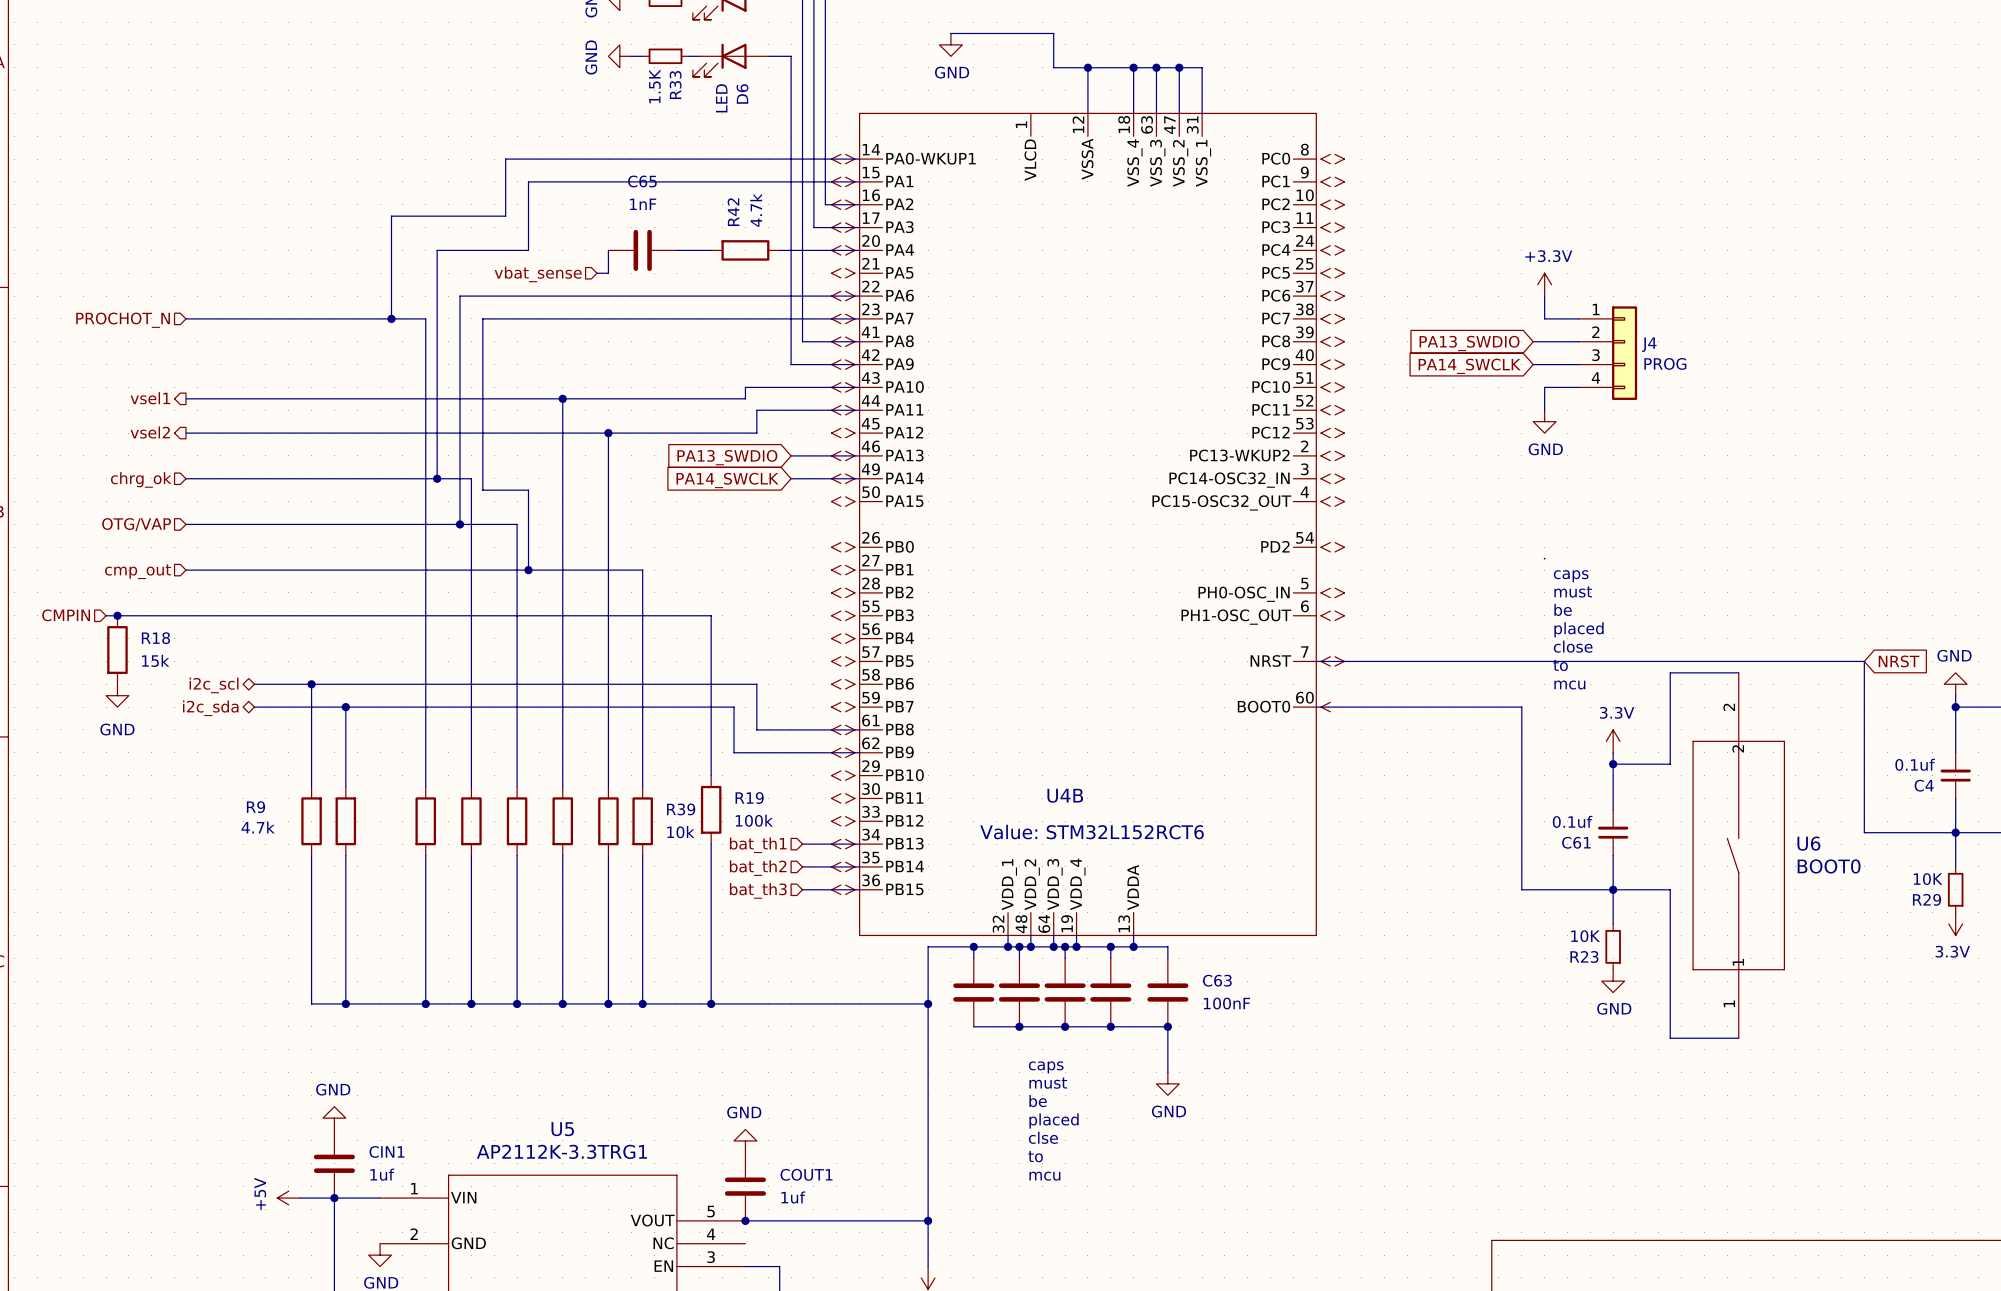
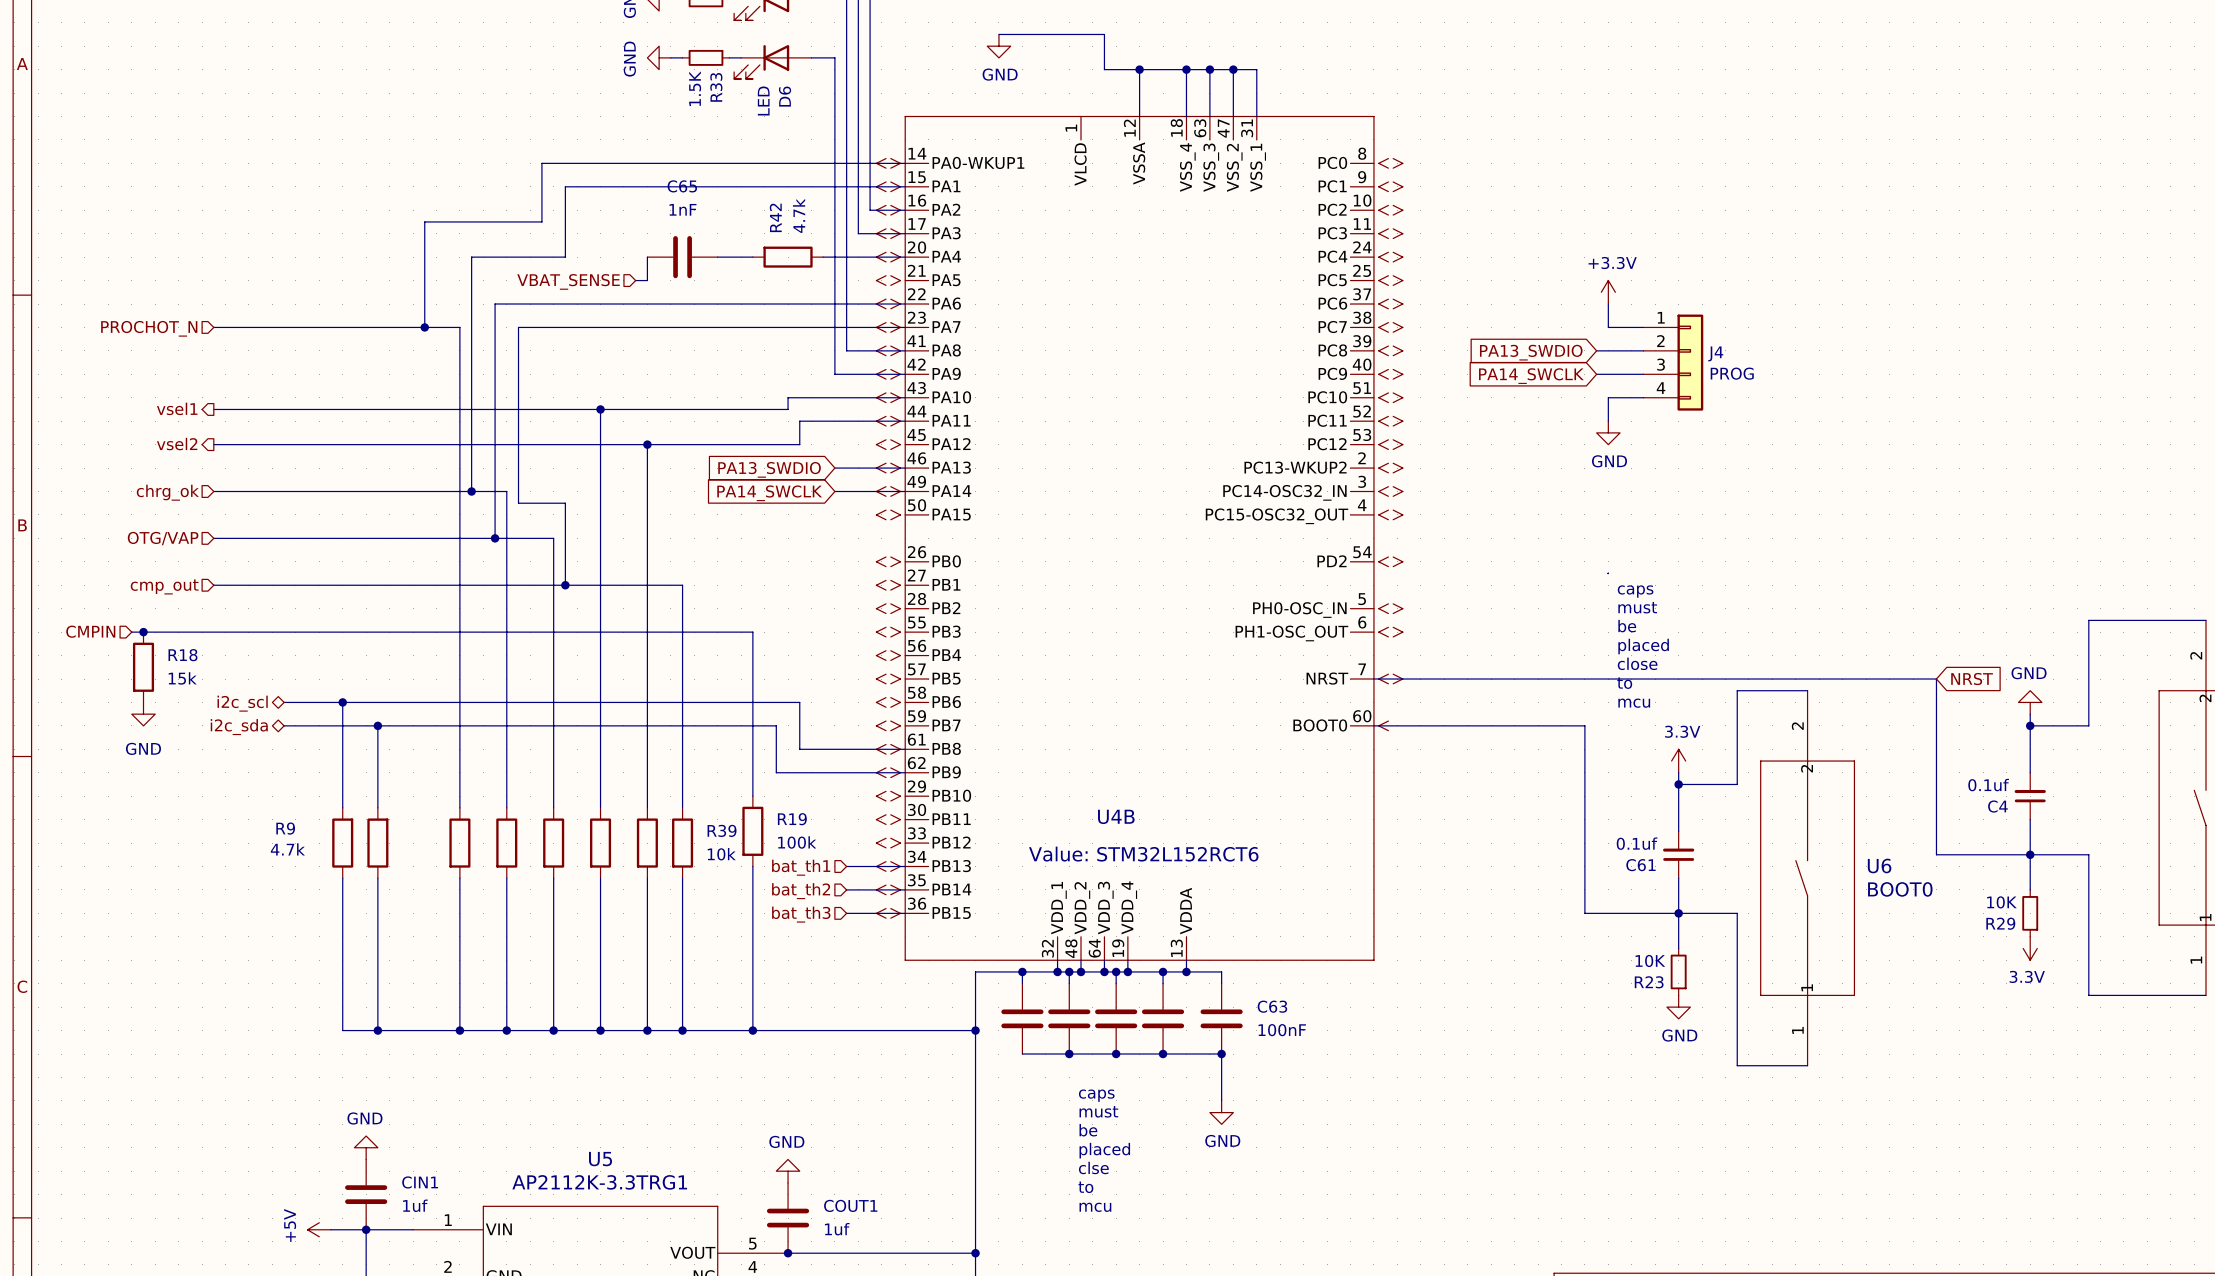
hierarchical label: vbat_sense (538, 274) -> VBAT_SENSE (568, 281)

